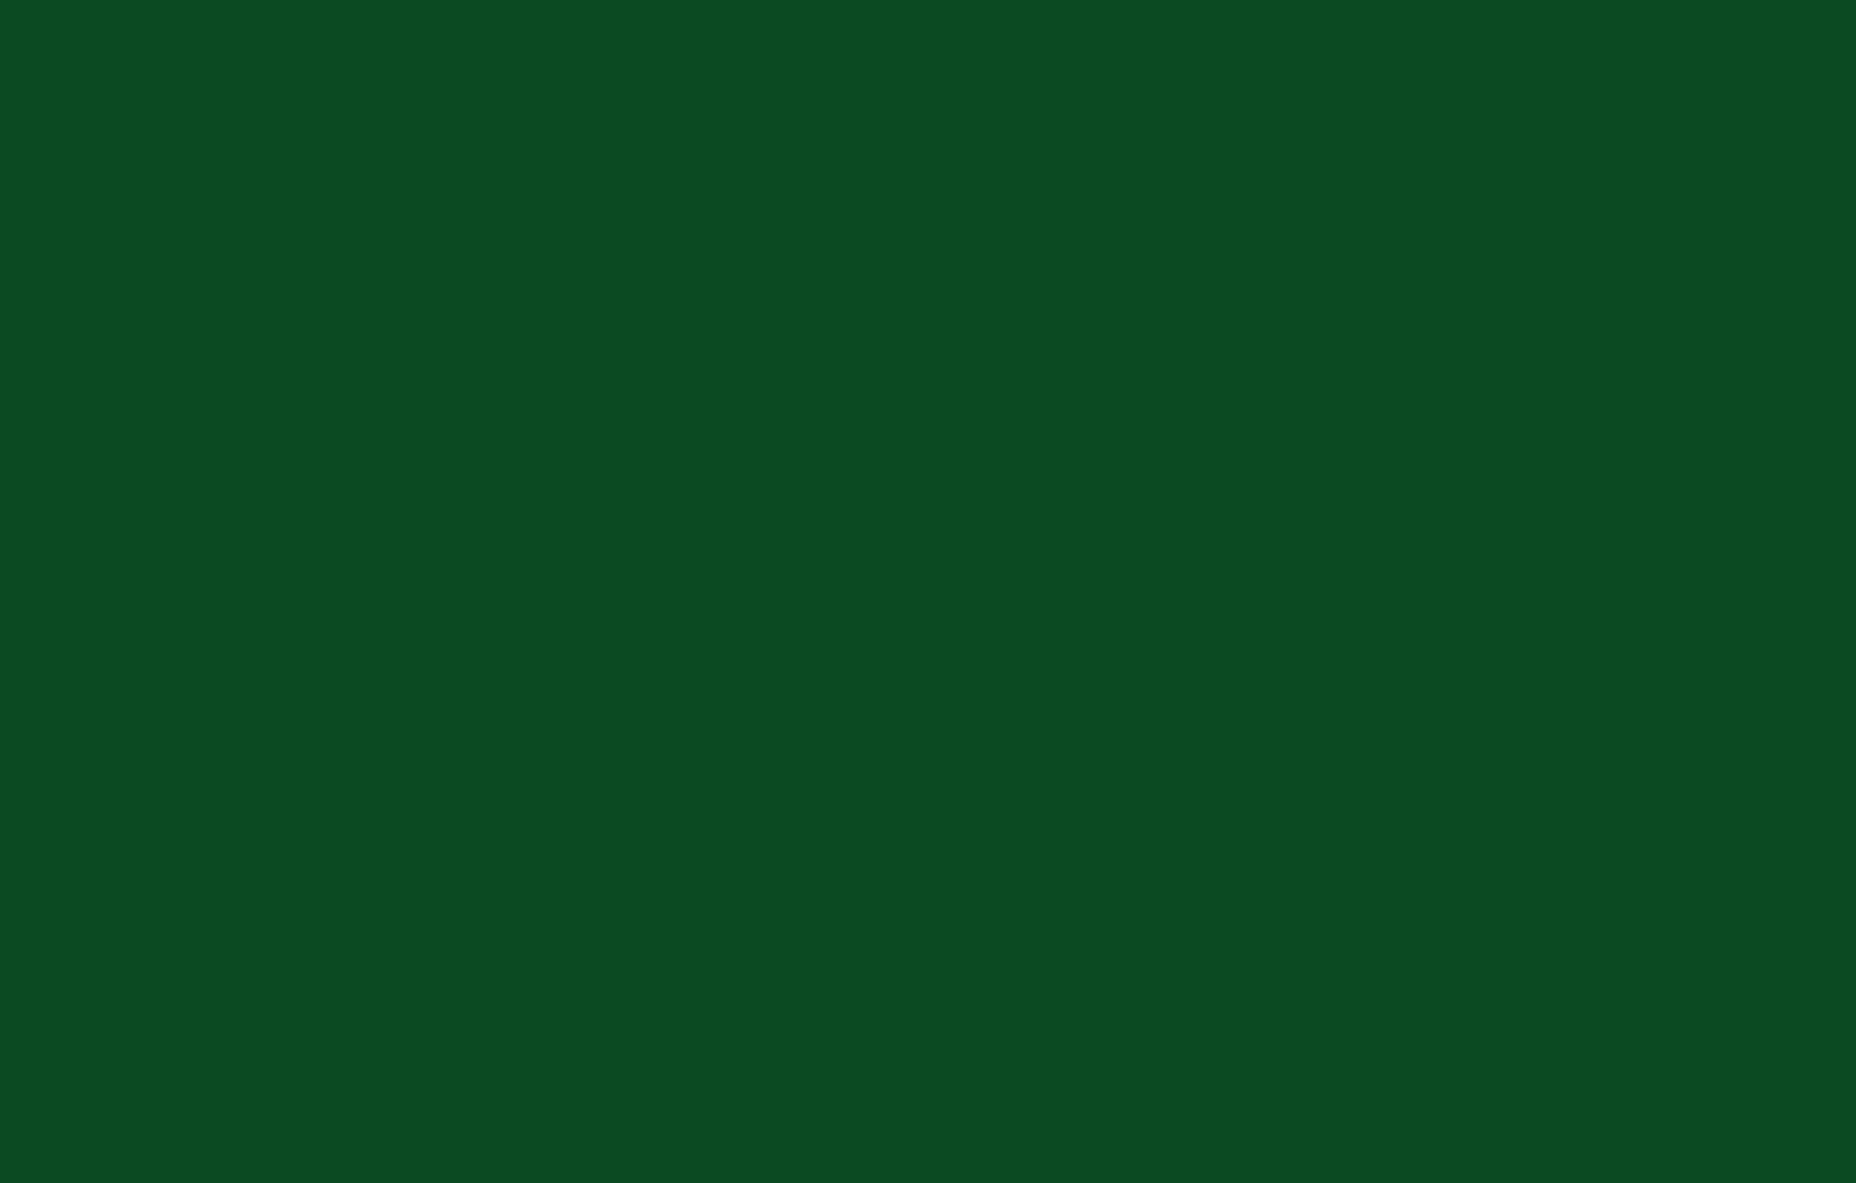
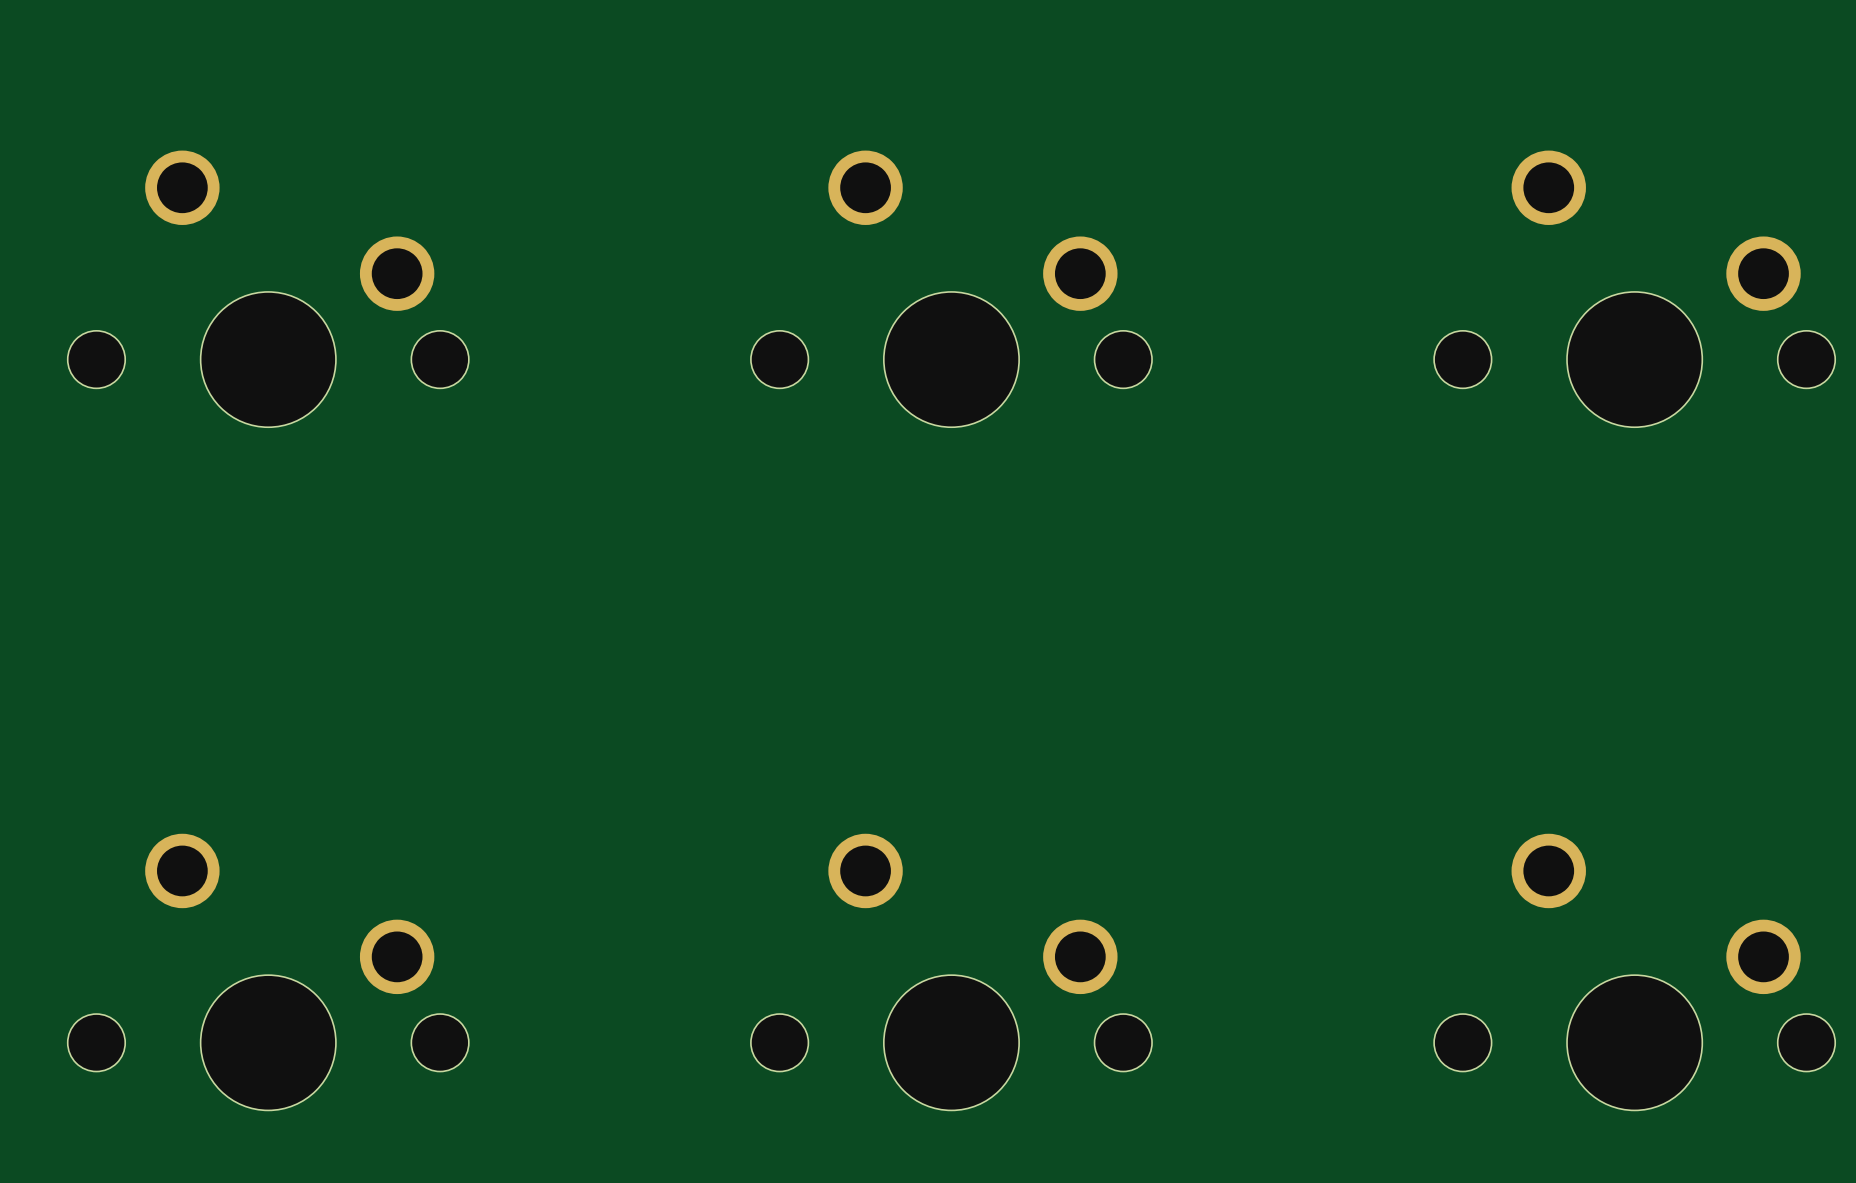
part: none -> (268, 288)
part: none -> (951, 288)
part: none -> (1634, 288)
part: none -> (268, 972)
part: none -> (951, 972)
part: none -> (1634, 972)

